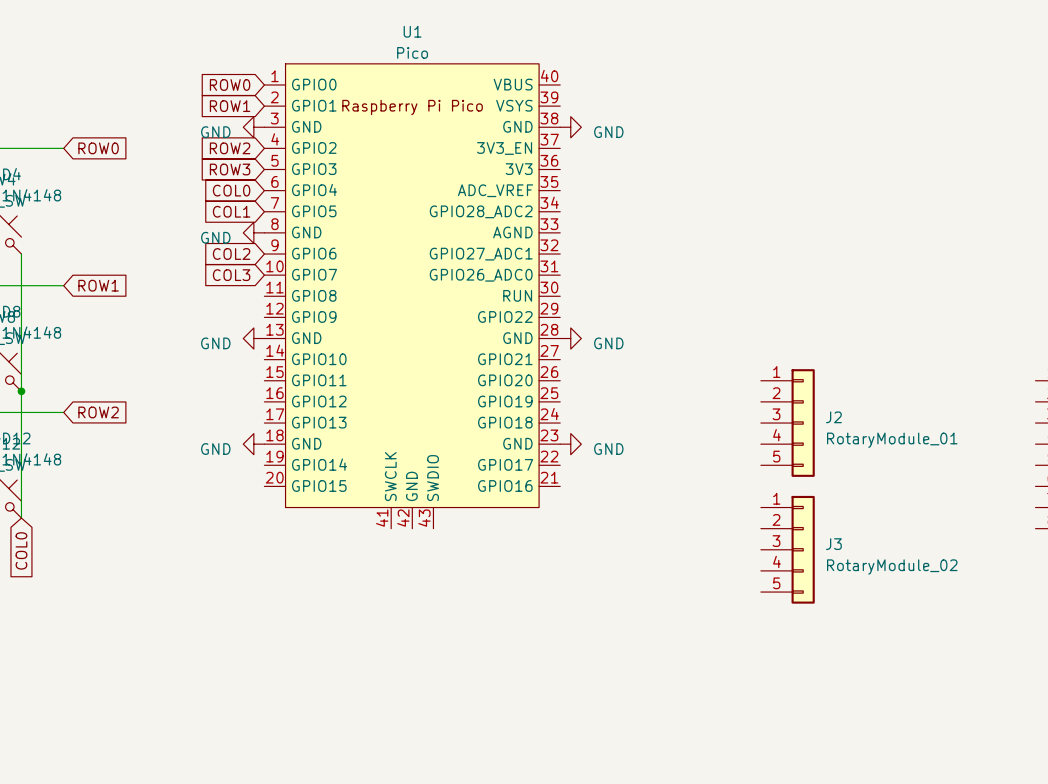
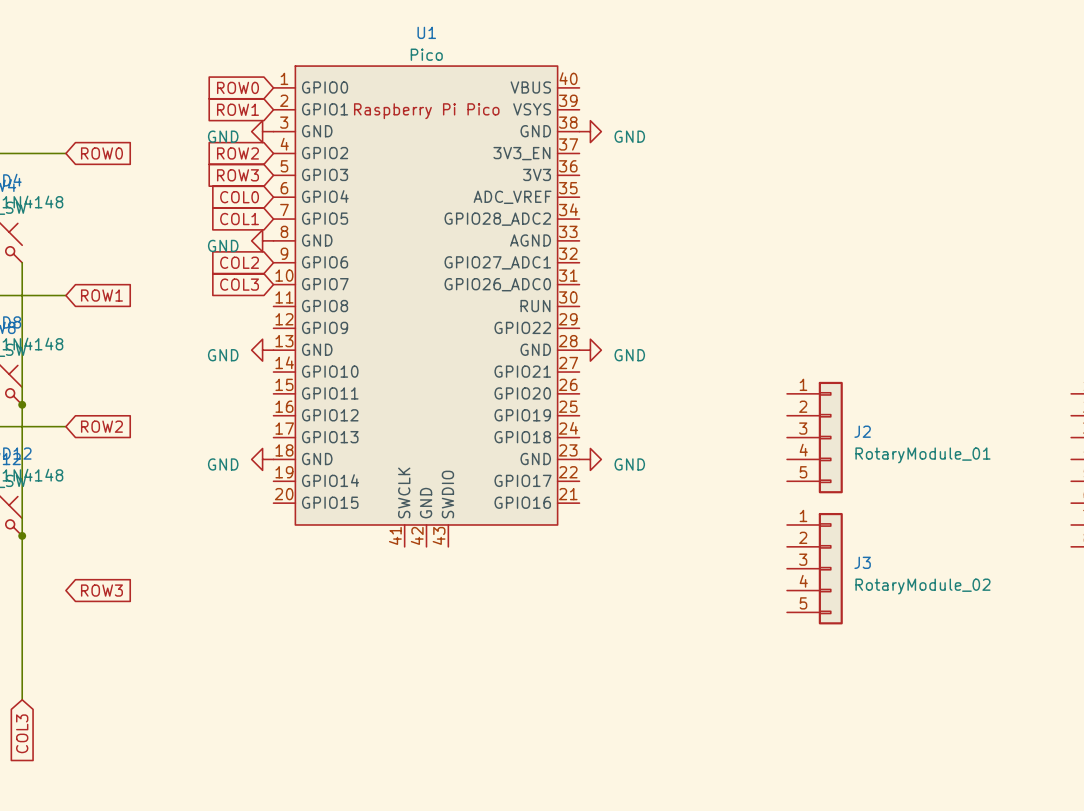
wire: none -> (22, 535) (22, 699)
junction: none -> (22, 535)
global label: COL0 (21, 550) -> none
global label: none -> ROW3 (101, 590)
global label: none -> COL3 (22, 733)

